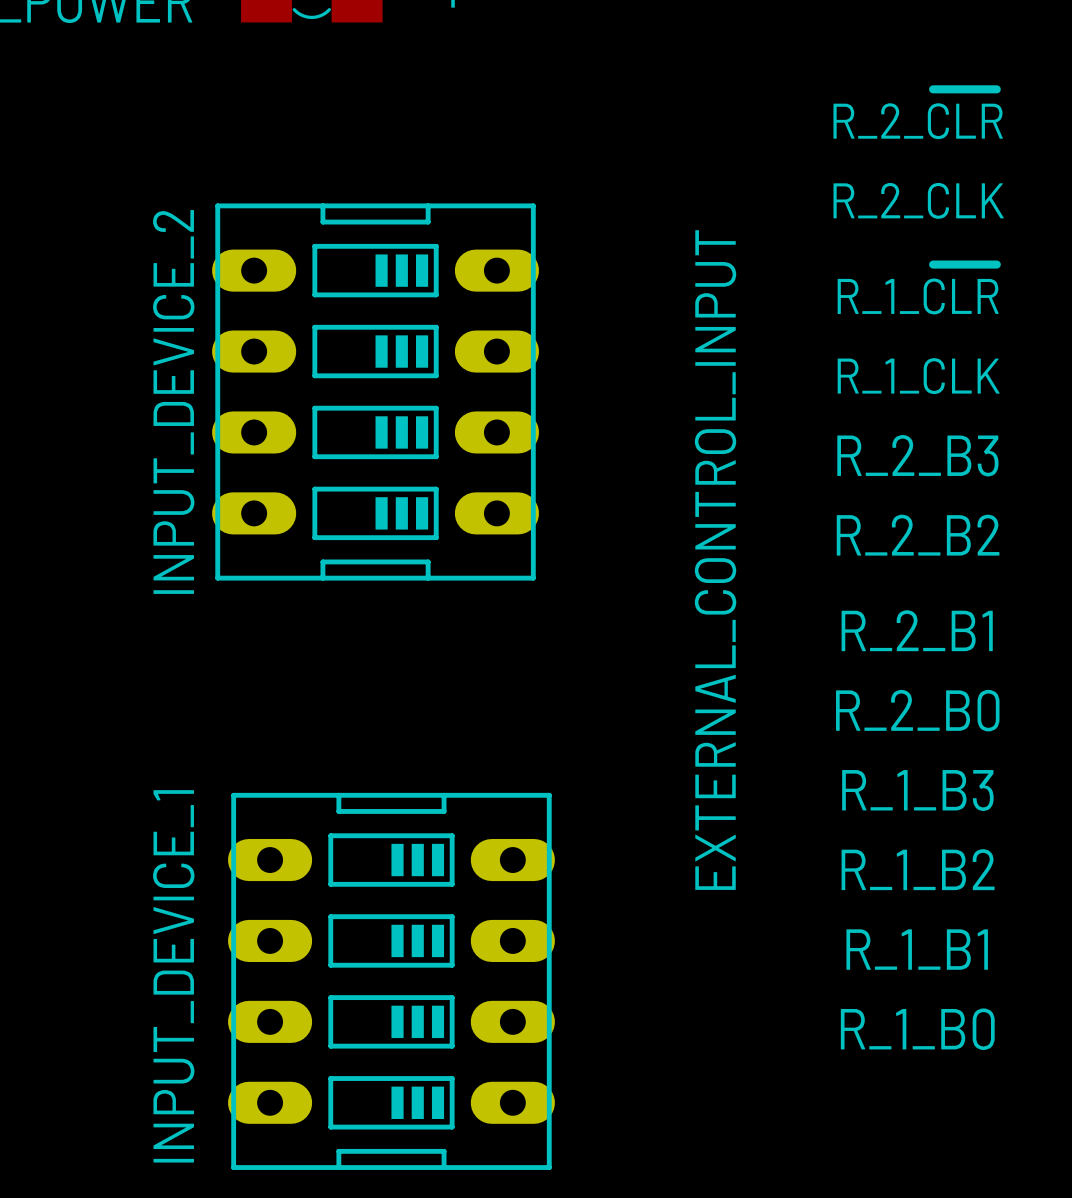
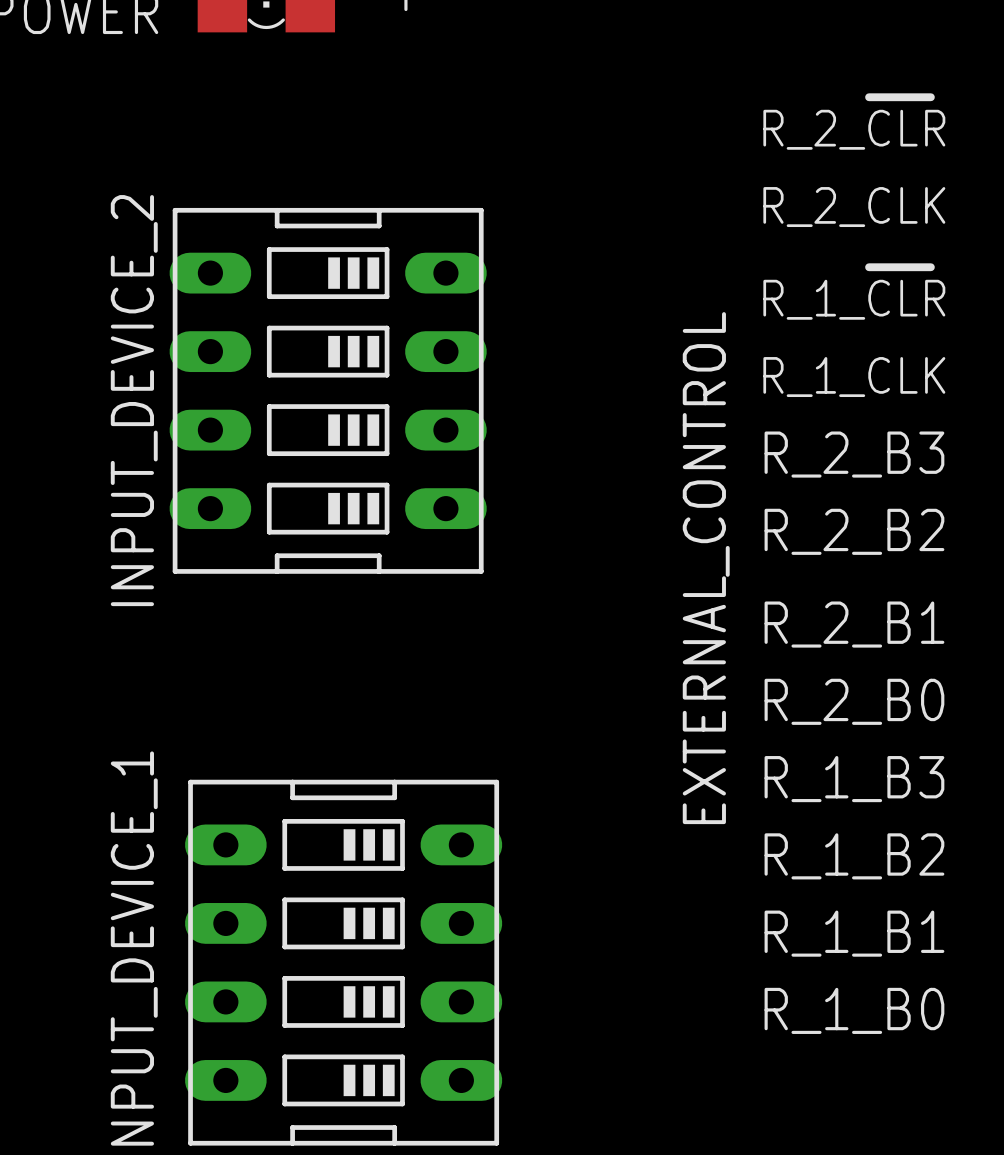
EXTERNAL_CONTROL_INPUT name: EXTERNAL_CONTROL_INPUT (715, 560) -> EXTERNAL_CONTROL (706, 568)

